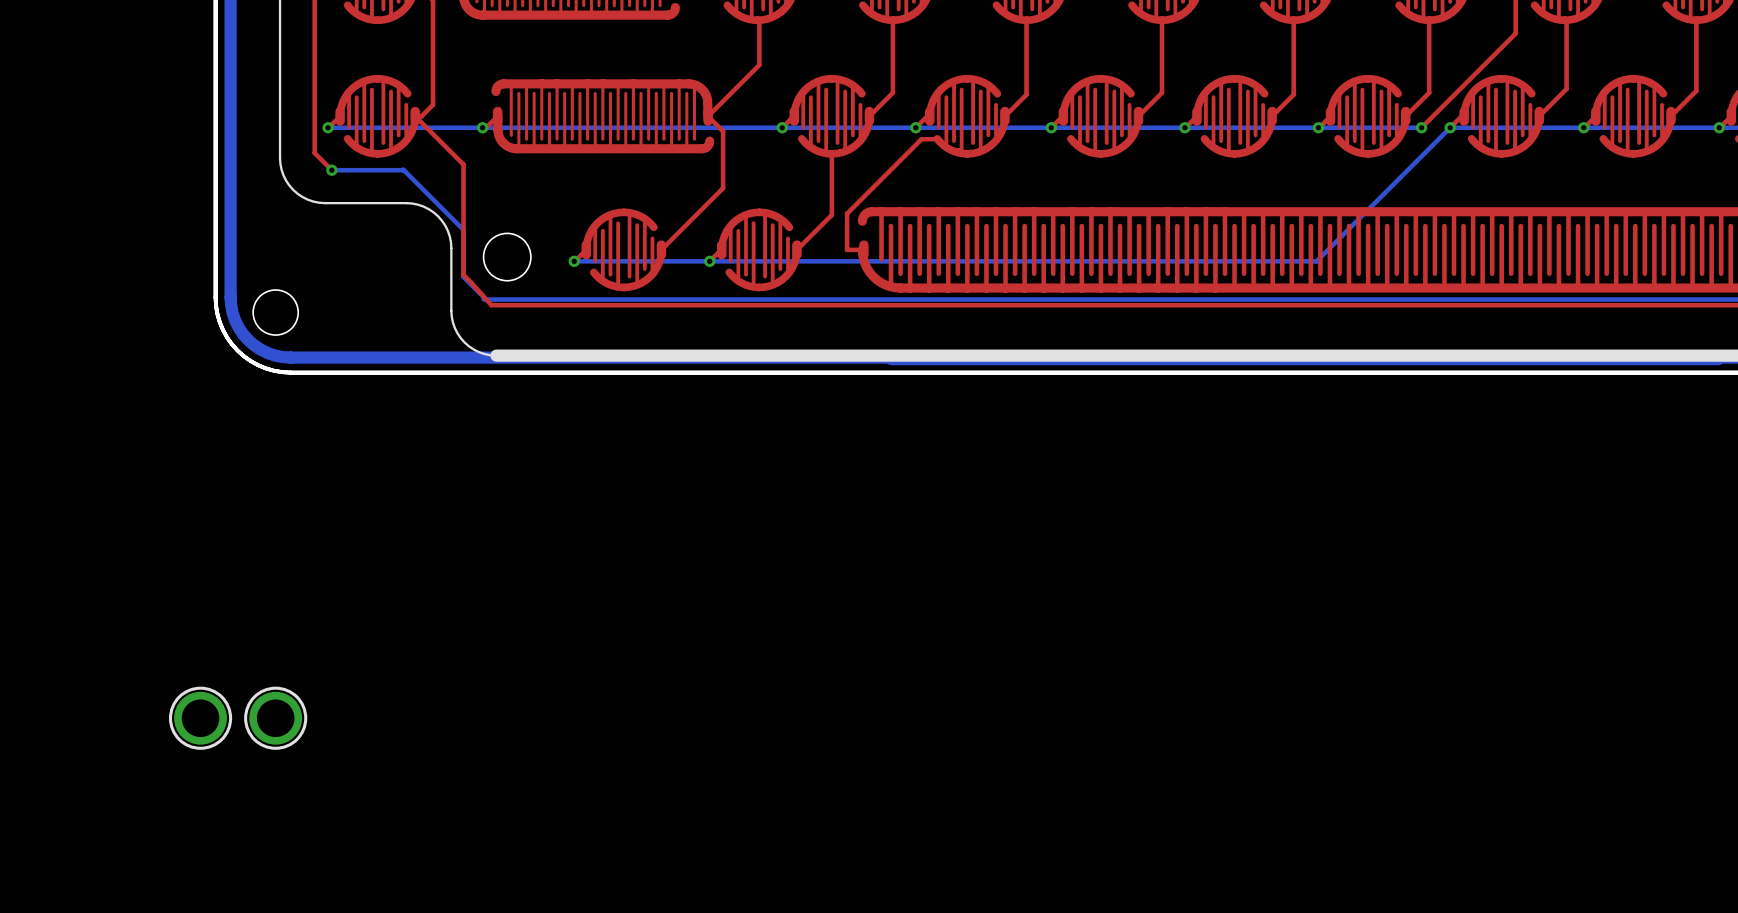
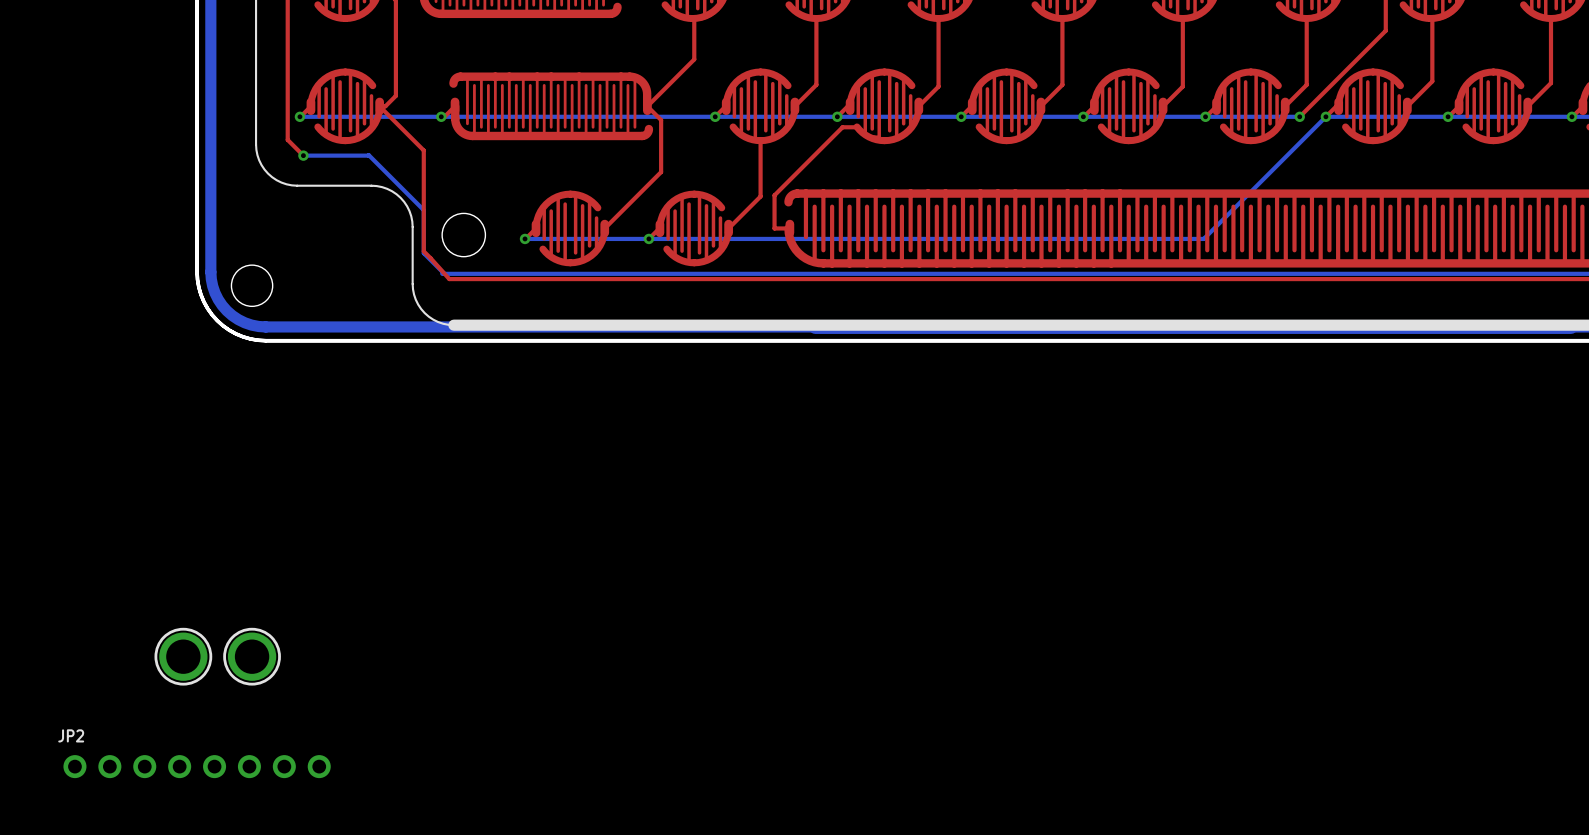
JP2: none -> (197, 766)

